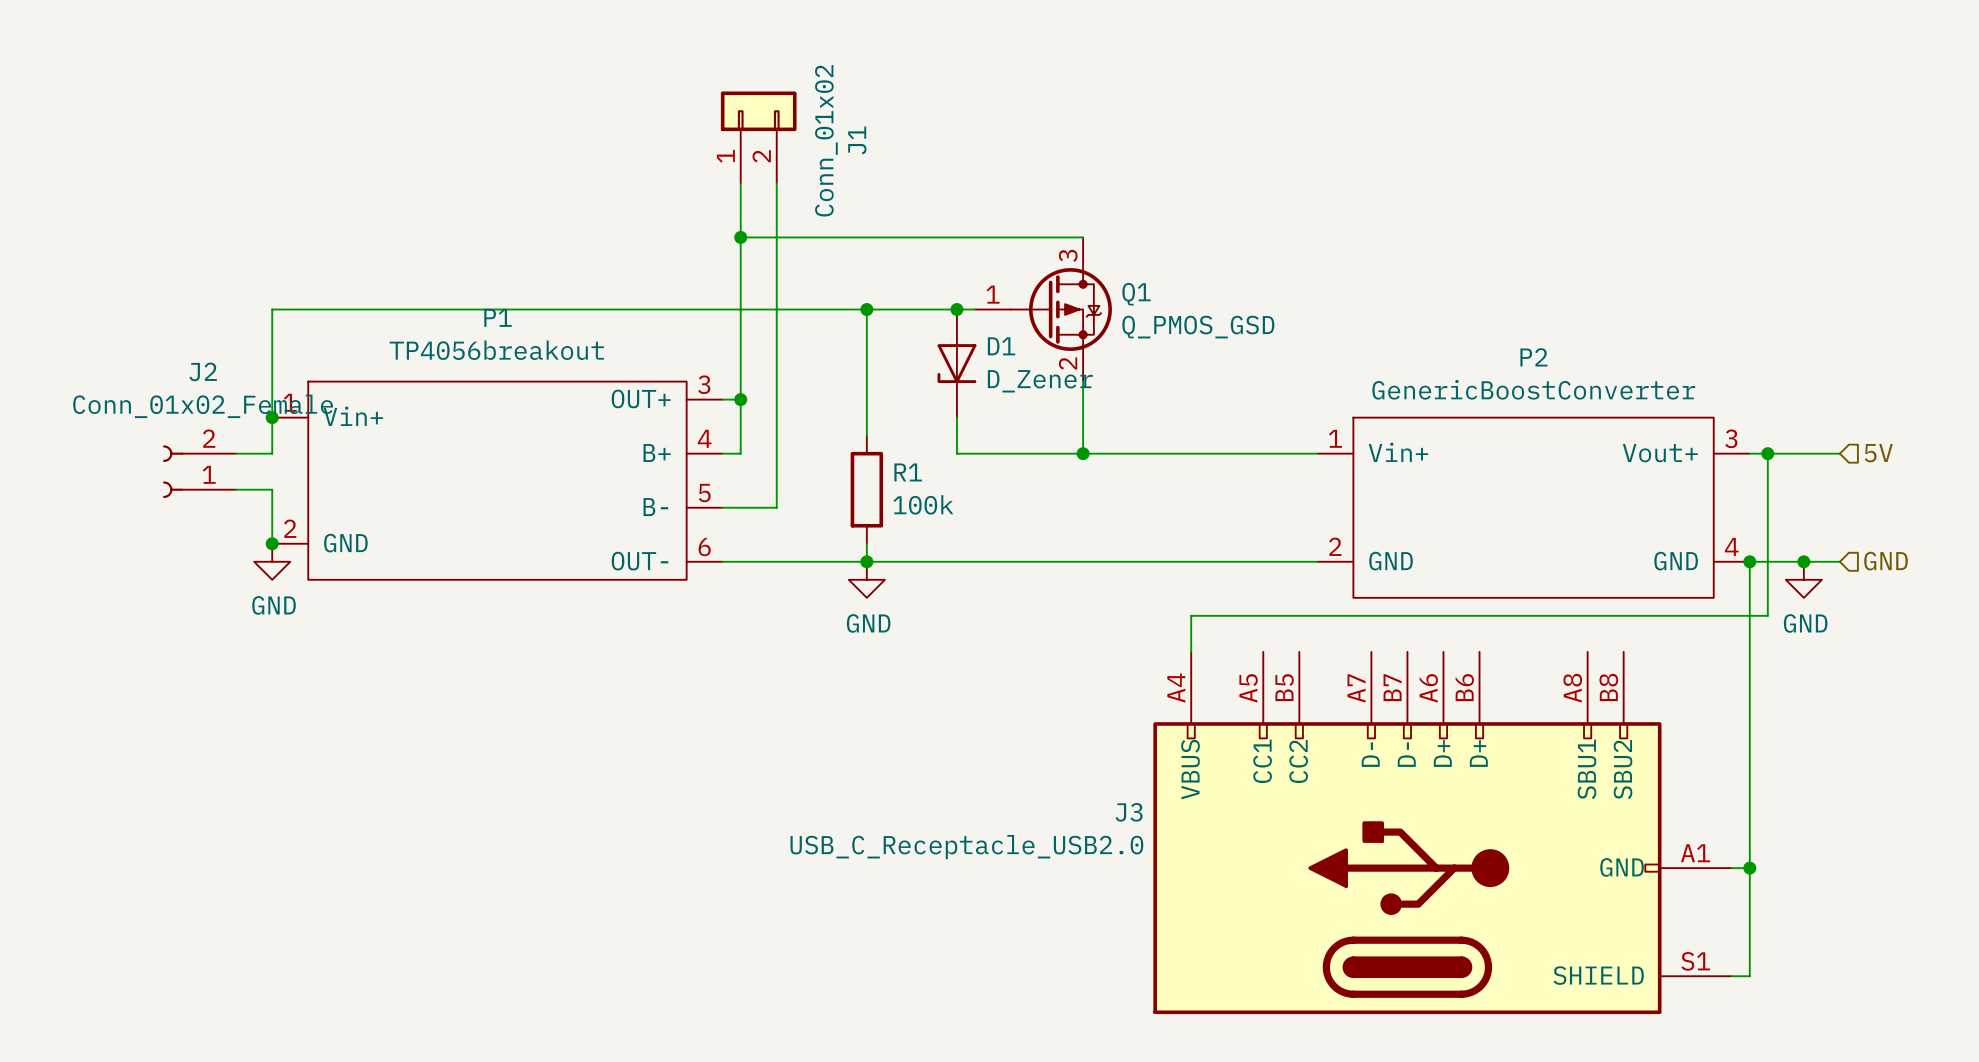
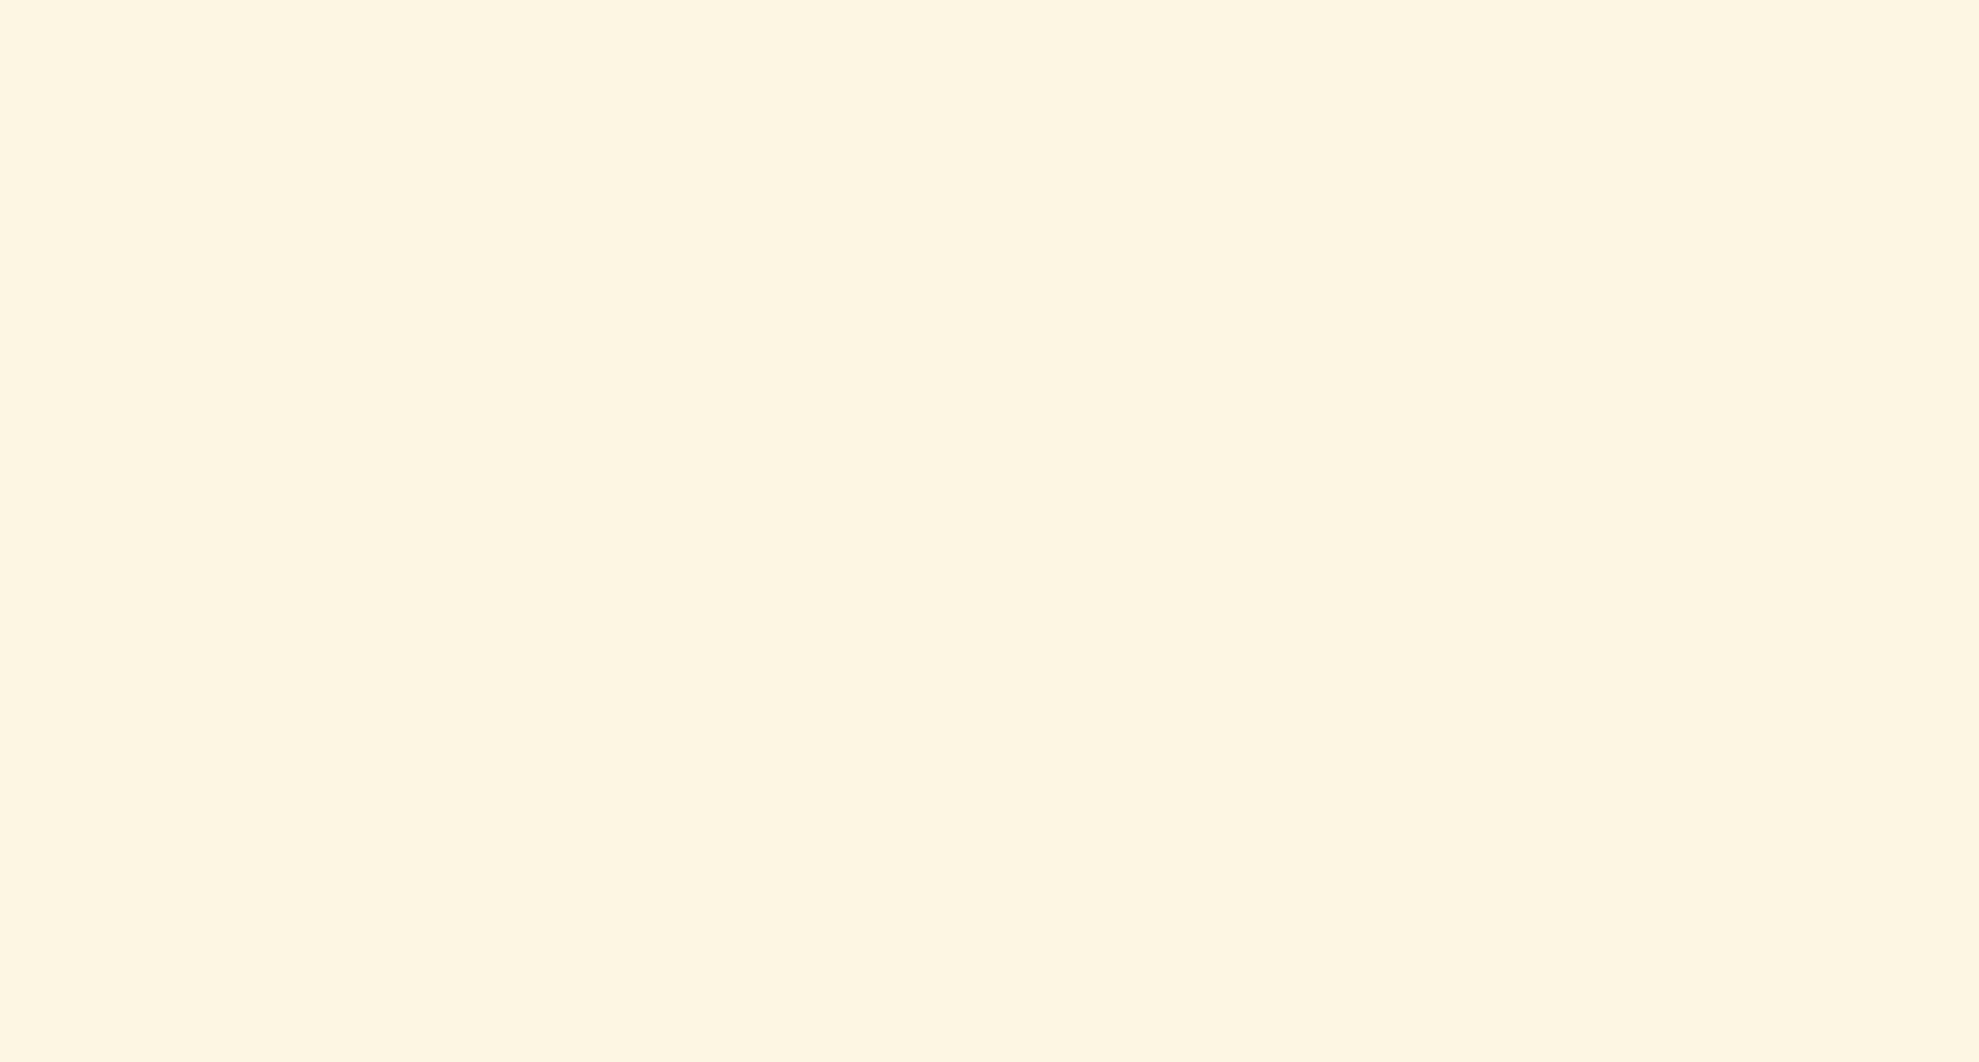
J1: Conn_01x02 (758, 137) -> none
wire: (740, 183) (740, 453) (722, 453) -> none
wire: (776, 183) (776, 507) (722, 507) -> none
wire: (740, 237) (1083, 237) -> none
junction: (740, 237) -> none
wire: (866, 309) (866, 435) -> none
junction: (866, 309) -> none
junction: (956, 309) -> none
wire: (974, 309) (272, 309) (272, 453) (236, 453) -> none
Q1: Q_PMOS_GSD (1043, 309) -> none
D1: D_Zener (956, 363) -> none
wire: (1083, 381) (1083, 453) -> none
wire: (722, 399) (740, 399) -> none
junction: (740, 399) -> none
junction: (272, 417) -> none
wire: (956, 417) (956, 453) (1317, 453) -> none
junction: (1083, 453) -> none
wire: (1749, 453) (1839, 453) -> none
wire: (1767, 453) (1767, 615) (1191, 615) (1191, 651) -> none
junction: (1767, 453) -> none
hierarchical label: 5V (1878, 453) -> none
J2: Conn_01x02_Female (199, 471) -> none
P1: TP4056breakout (497, 480) -> none
wire: (236, 489) (272, 489) (272, 543) -> none
R1: 100k (866, 489) -> none
P2: GenericBoostConverter (1533, 507) -> none
junction: (272, 543) -> none
wire: (866, 543) (866, 561) -> none
power symbol: GND (272, 561) -> none
wire: (722, 561) (1317, 561) -> none
junction: (866, 561) -> none
junction: (1749, 561) -> none
junction: (1803, 561) -> none
wire: (1839, 561) (1749, 561) (1749, 976) (1731, 976) -> none
hierarchical label: GND (1886, 561) -> none
power symbol: GND (866, 579) -> none
power symbol: GND (1803, 579) -> none
J3: USB_C_Receptacle_USB2.0 (1442, 832) -> none
wire: (1731, 868) (1749, 868) -> none
junction: (1749, 868) -> none

